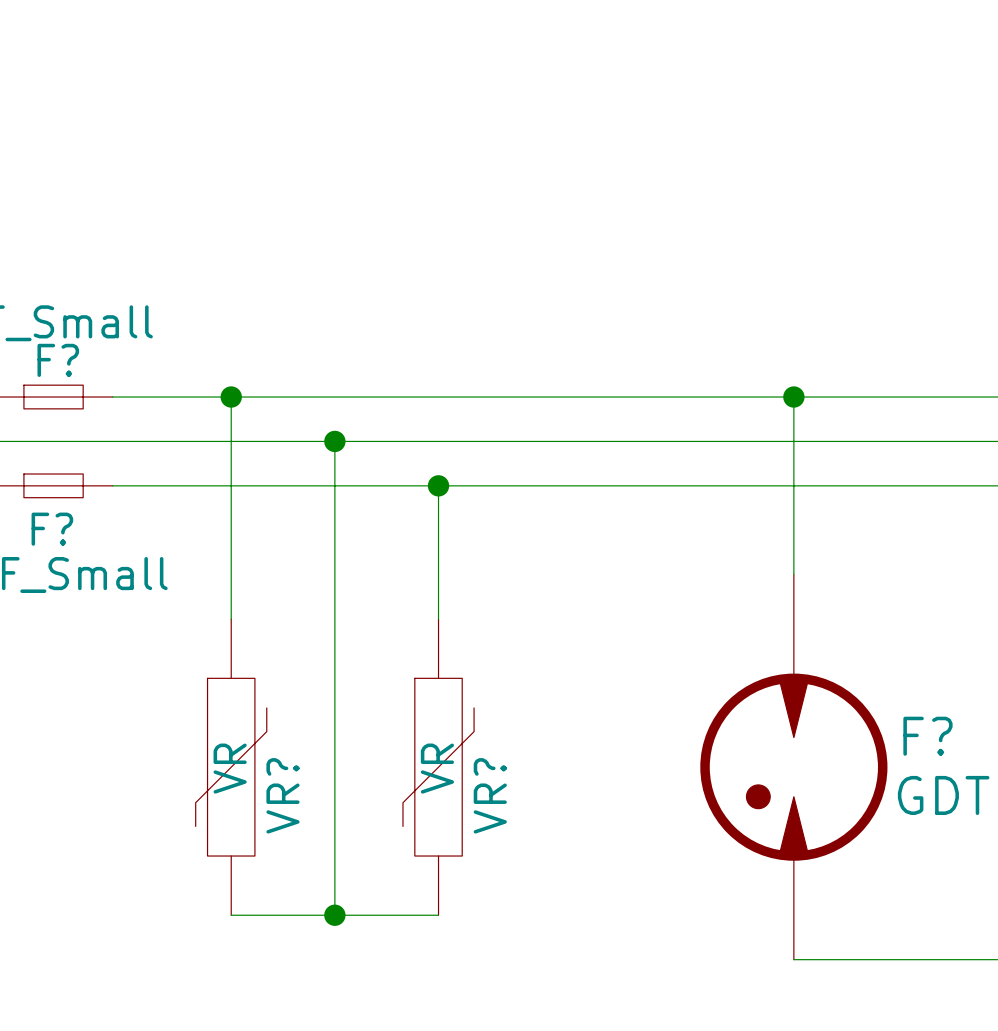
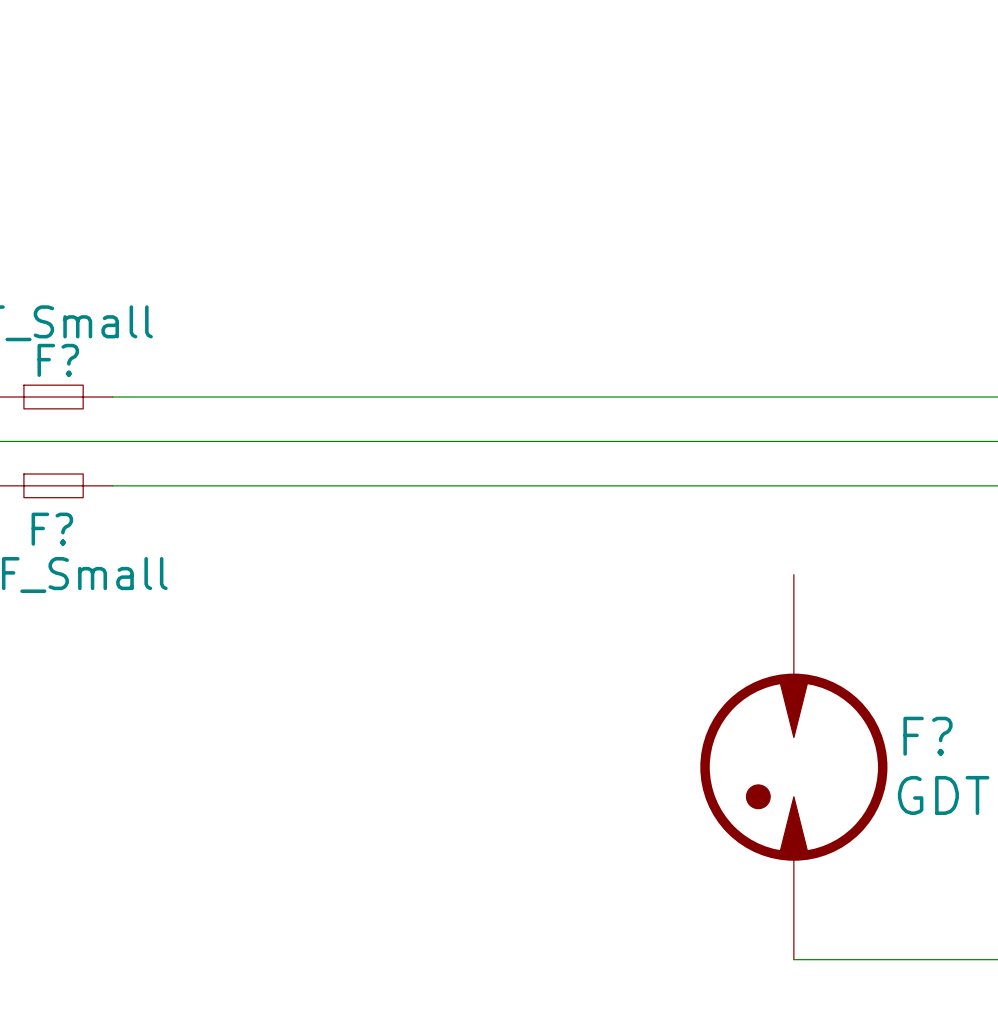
wire: (231, 397) (231, 619) -> none
junction: (231, 397) -> none
wire: (793, 397) (793, 574) -> none
junction: (793, 397) -> none
wire: (334, 441) (334, 915) -> none
junction: (334, 441) -> none
wire: (438, 485) (438, 619) -> none
junction: (438, 485) -> none
VR?: VR (231, 767) -> none
VR?: VR (438, 767) -> none
wire: (231, 915) (438, 915) -> none
junction: (334, 915) -> none

